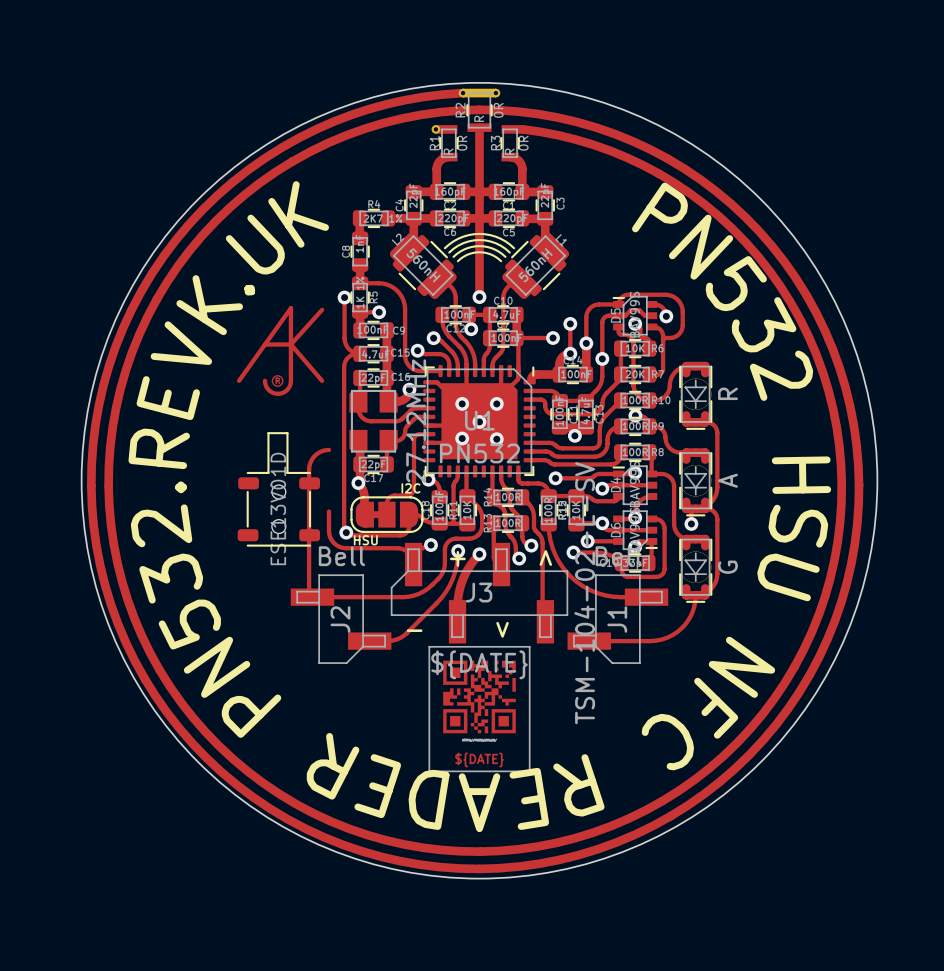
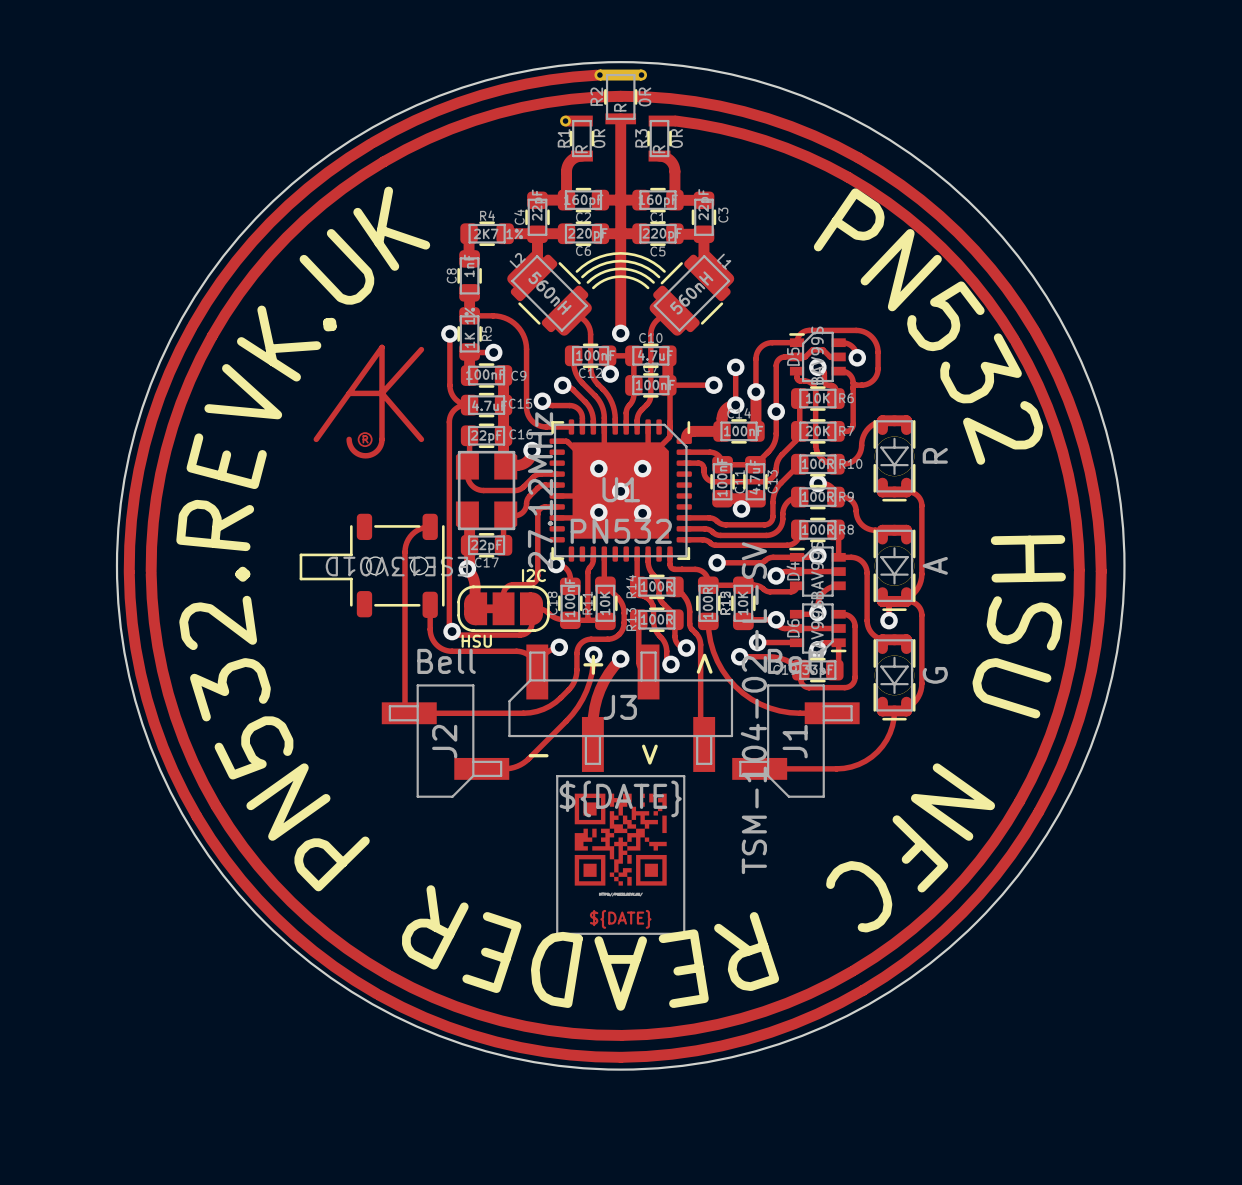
part rotation: 0° (278, 489) -> 90° counterclockwise (372, 565)

